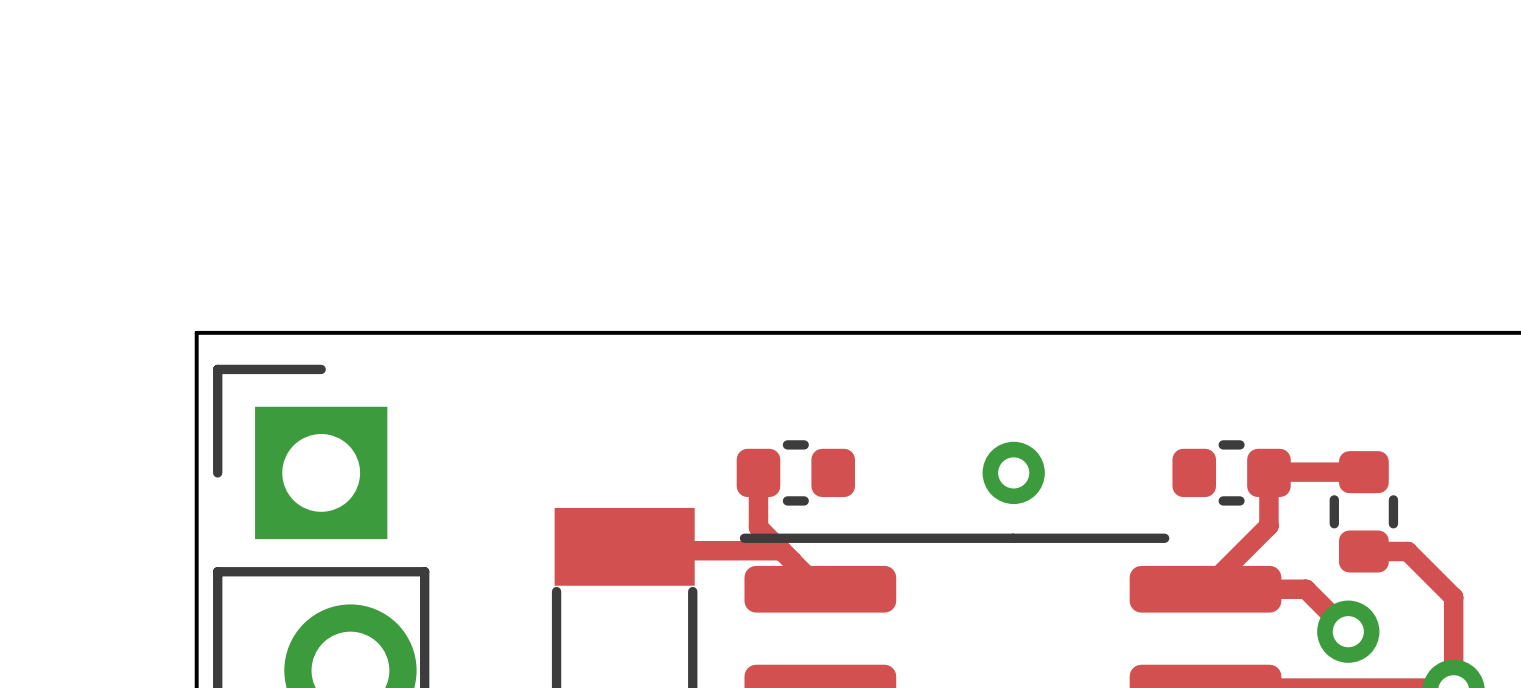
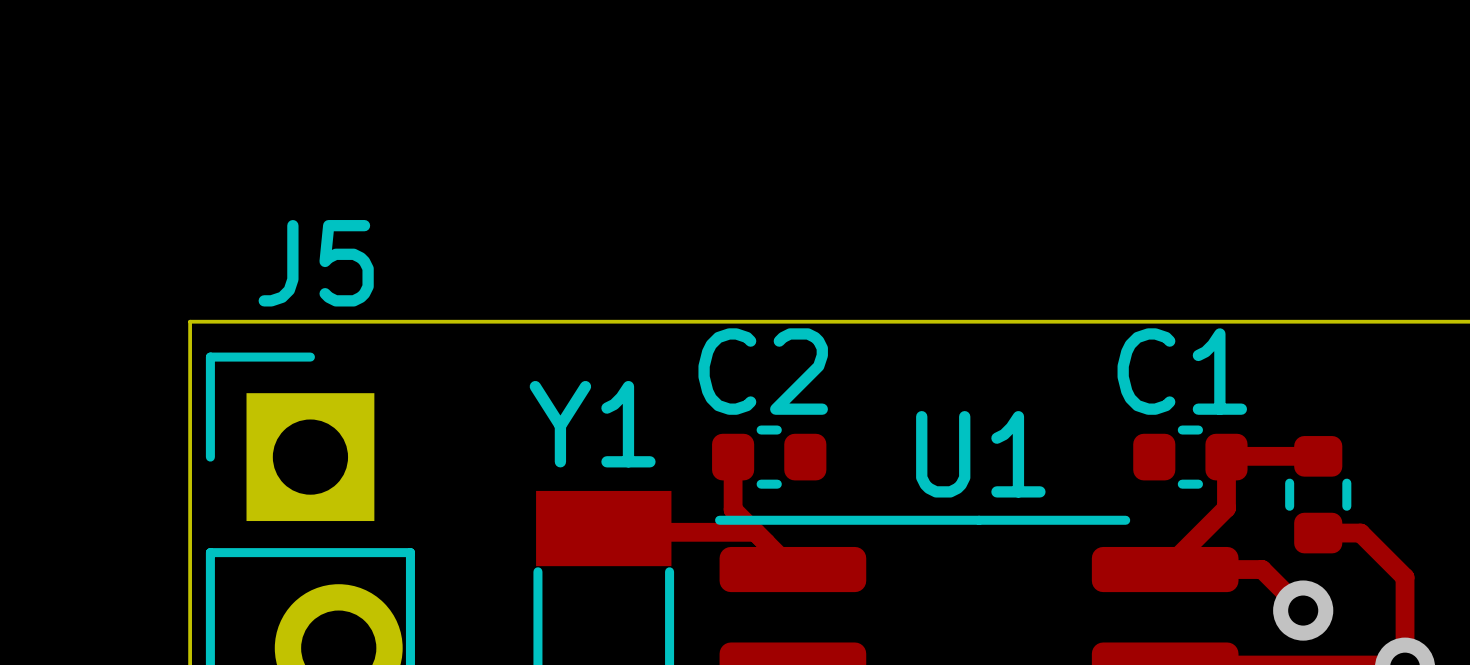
J5 name: none -> J5 (316, 263)
C2 name: none -> C2 (763, 371)
C1 name: none -> C1 (1182, 371)
Y1 name: none -> Y1 (592, 424)
U1 name: none -> U1 (980, 454)
via: (1013, 472) -> none

